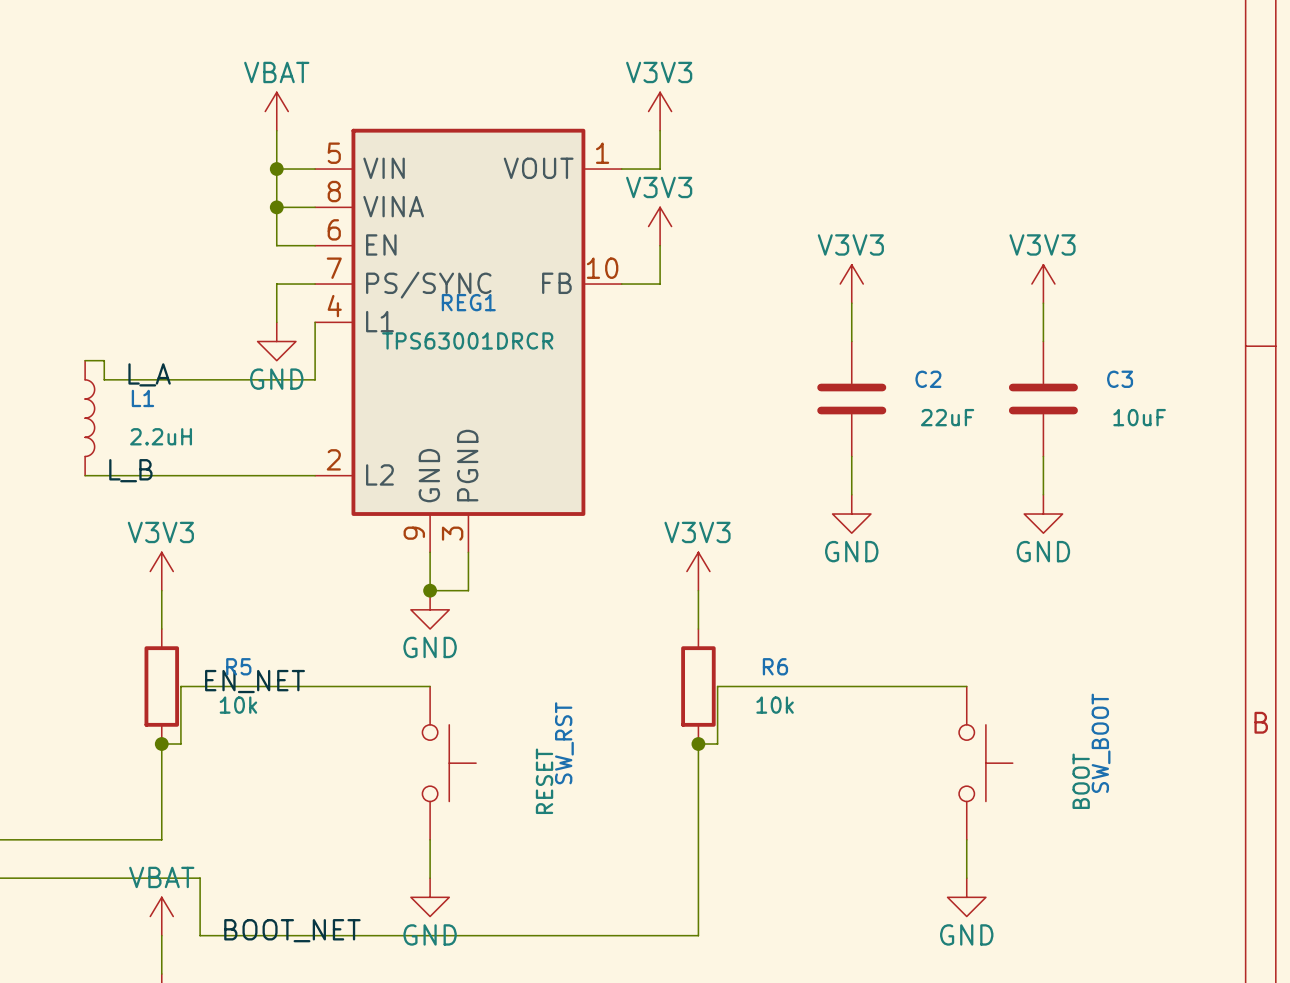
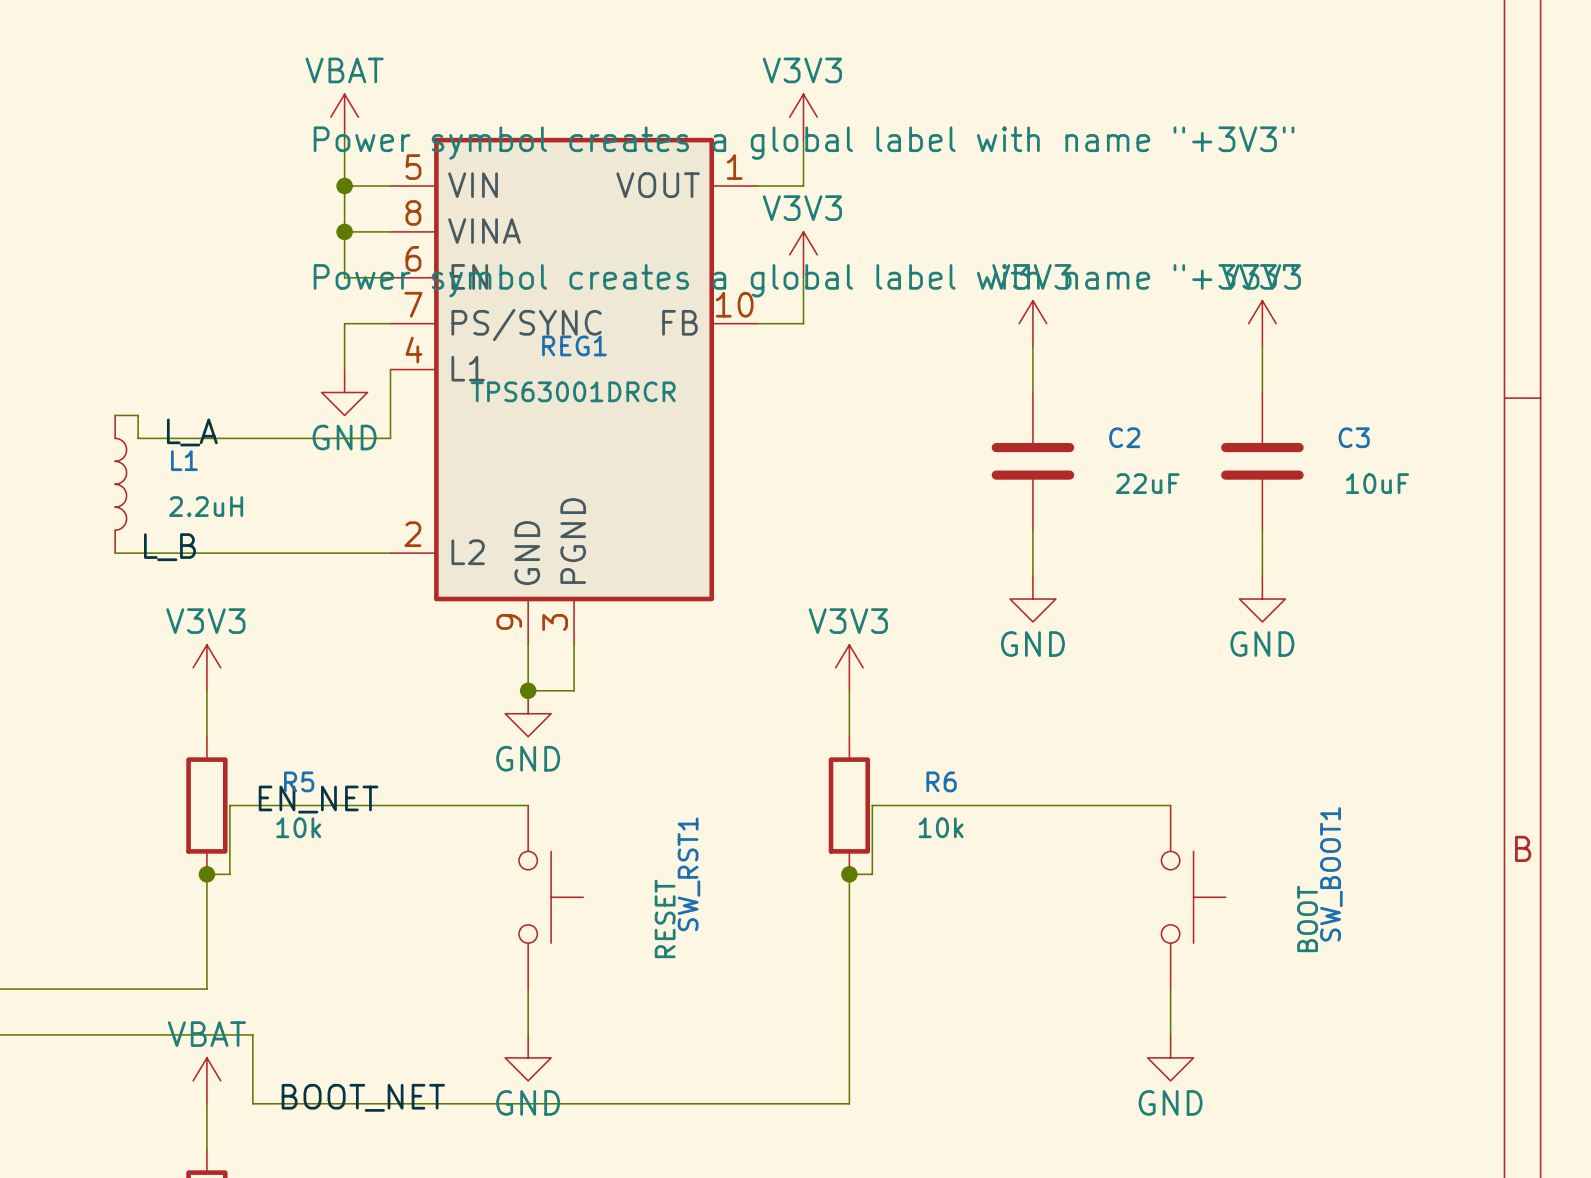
power symbol text: none -> Power symbol creates a global label with name "+3V3" (804, 143)
power symbol text: none -> Power symbol creates a global label with name "+3V3" (804, 280)
SW_RST name: SW_RST (564, 743) -> SW_RST1 (688, 874)
SW_BOOT name: SW_BOOT (1101, 743) -> SW_BOOT1 (1331, 874)

